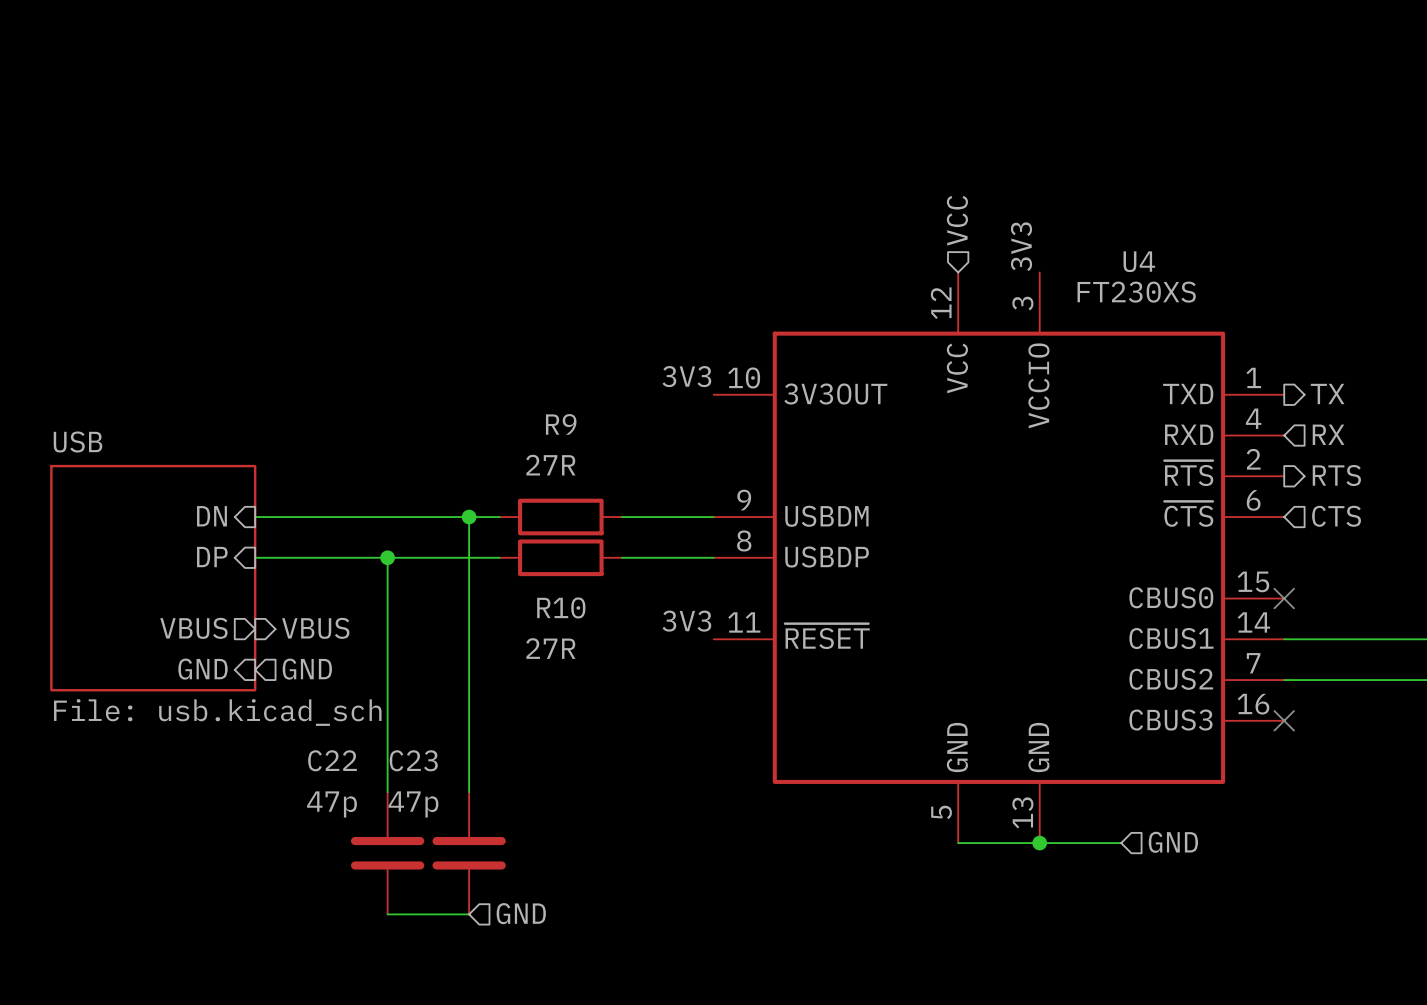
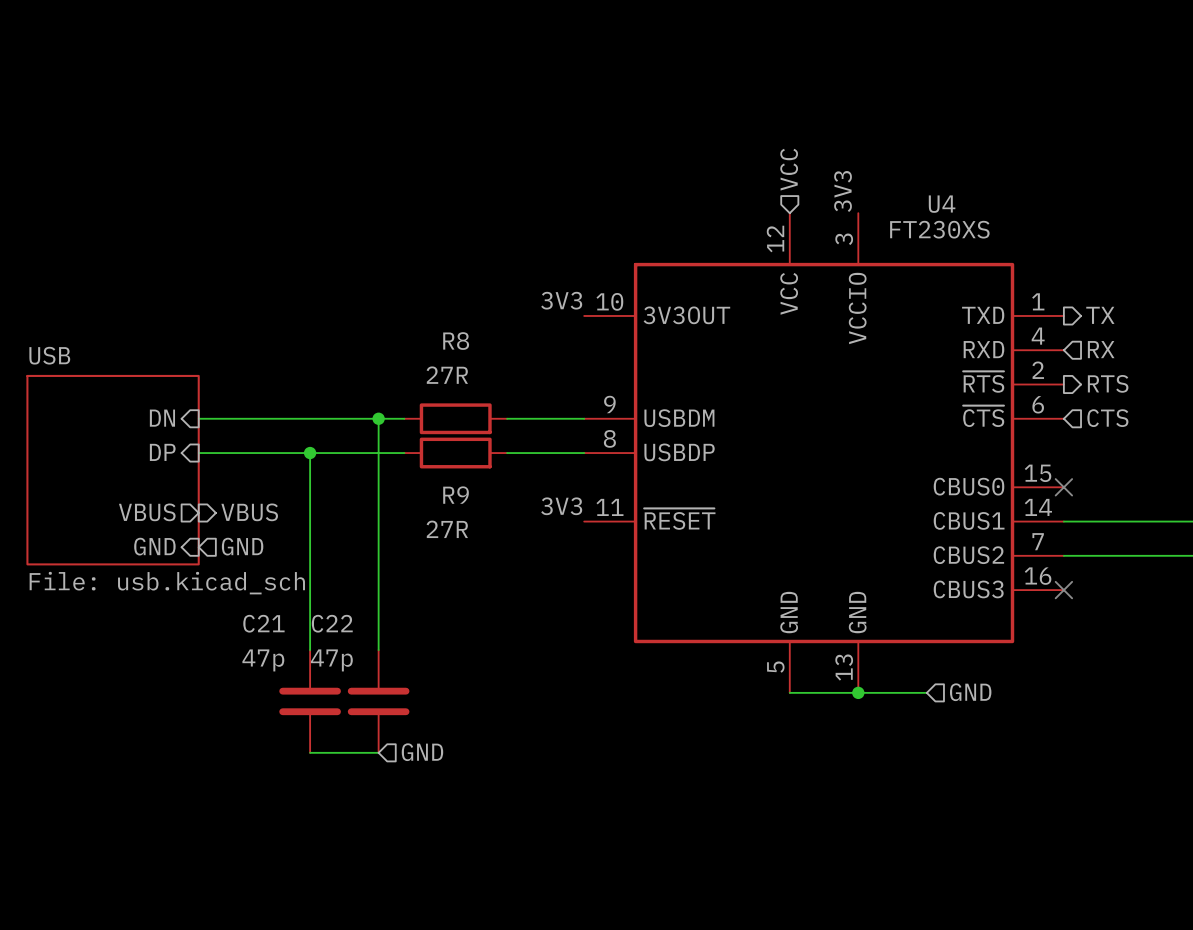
R9 name: R9 (561, 424) -> R8 (456, 341)
R10 name: R10 (561, 607) -> R9 (456, 495)
C22 name: C22 (332, 760) -> C21 (263, 623)
C23 name: C23 (413, 760) -> C22 (332, 623)

